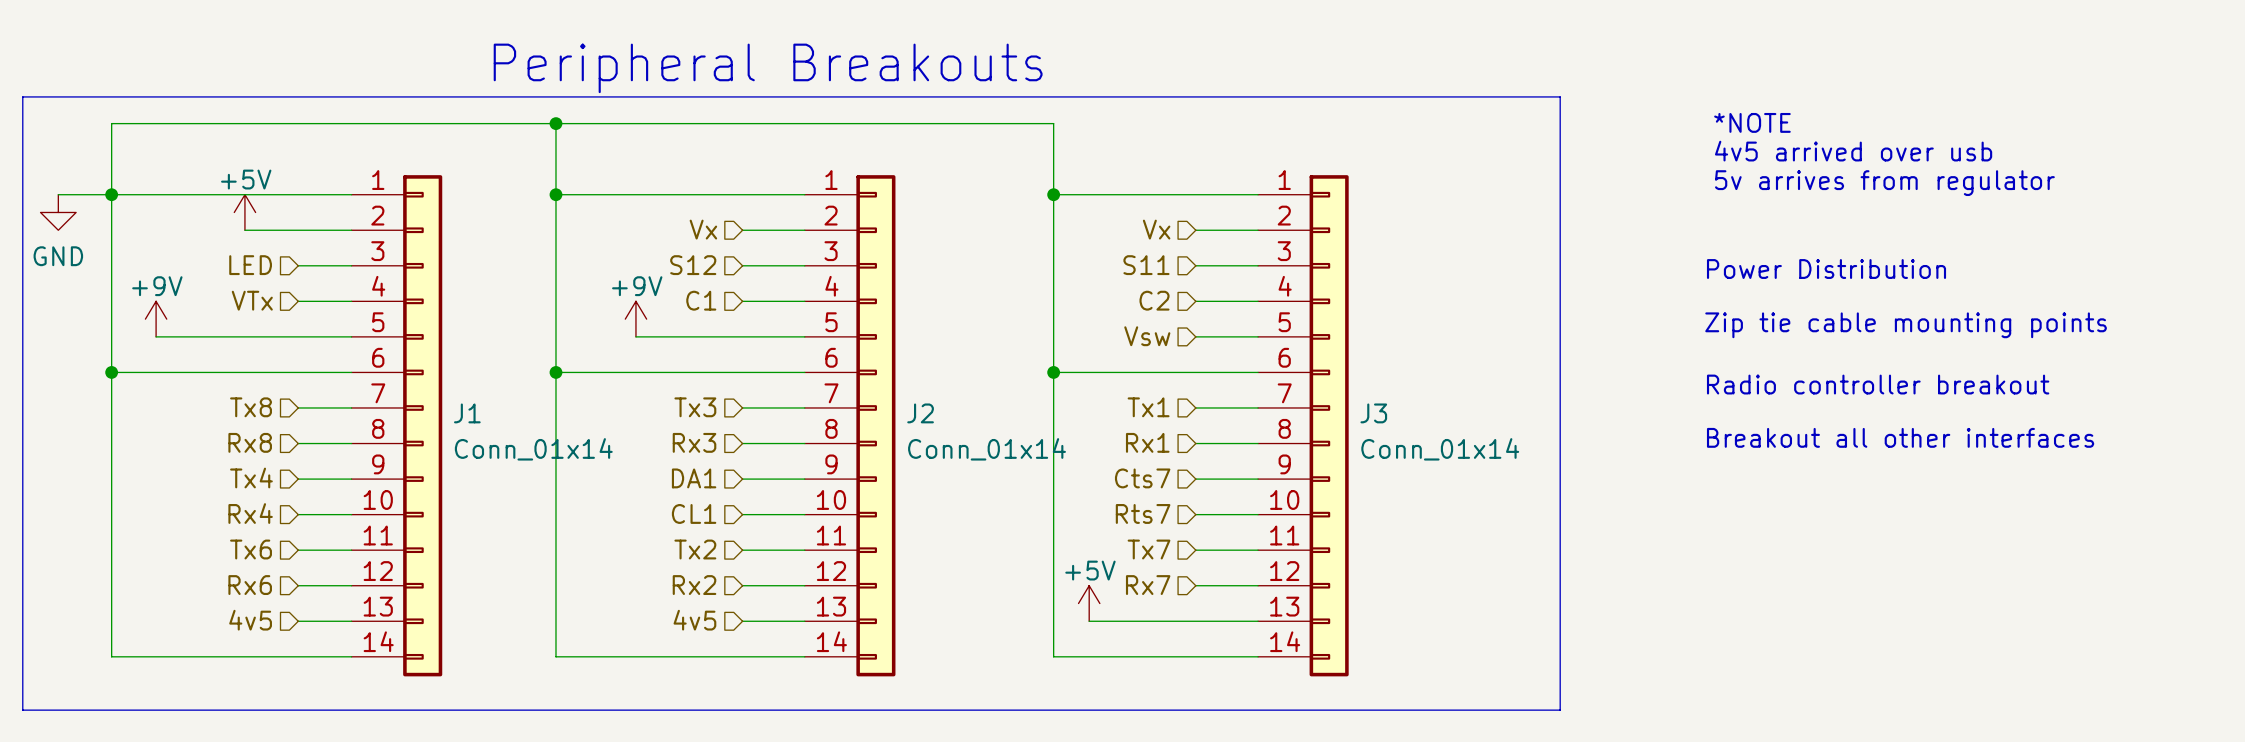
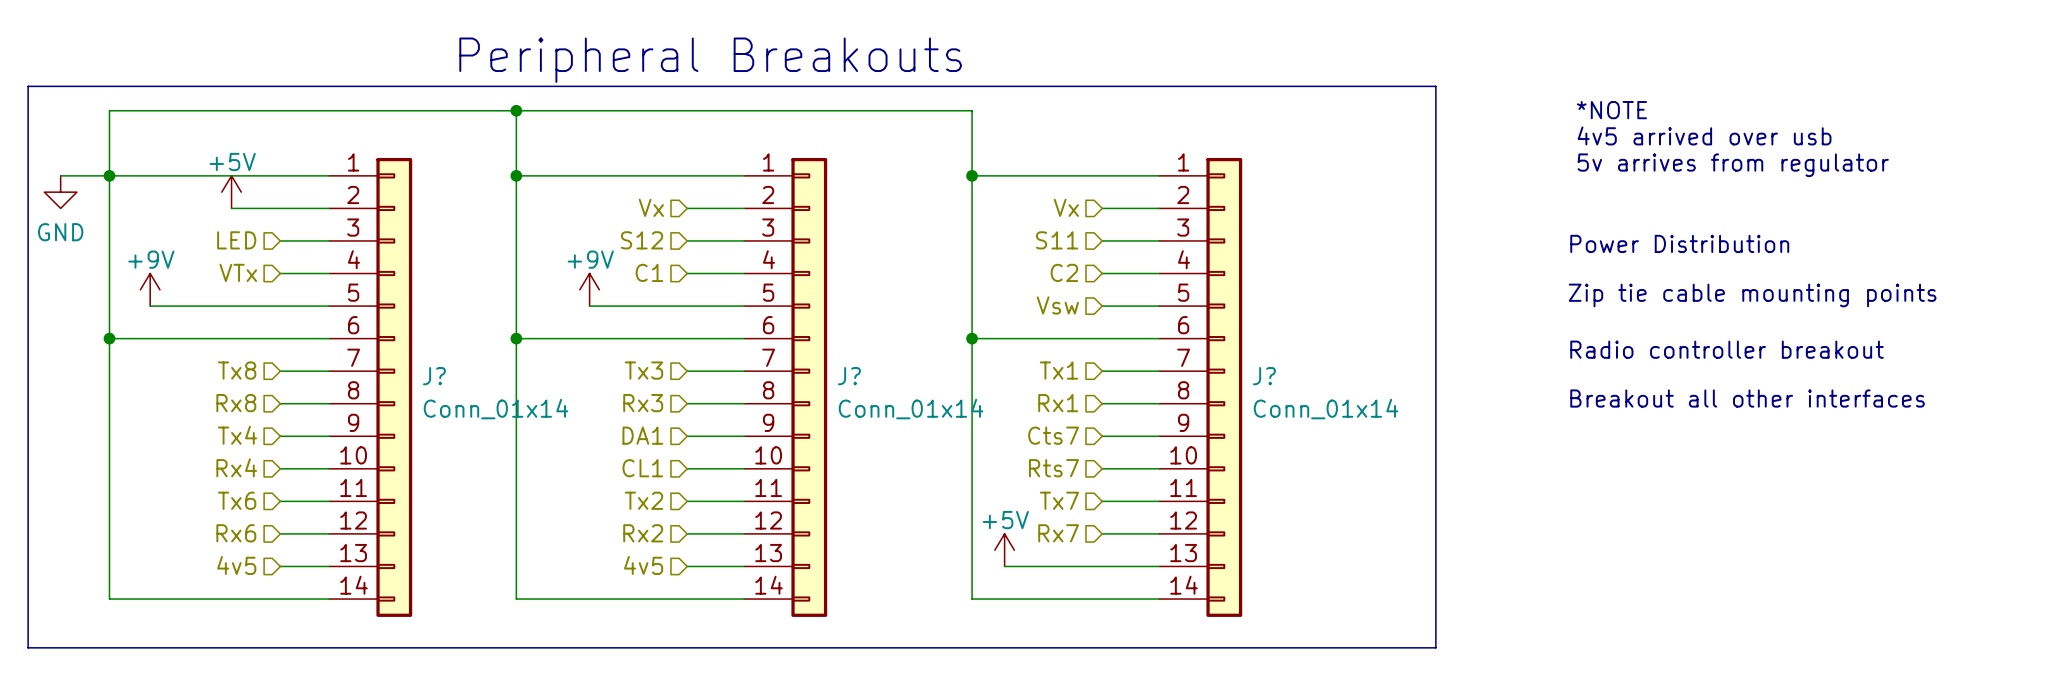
J1 name: J1 (467, 413) -> J? (434, 376)
J2 name: J2 (920, 413) -> J? (849, 376)
J3 name: J3 (1373, 413) -> J? (1264, 376)

